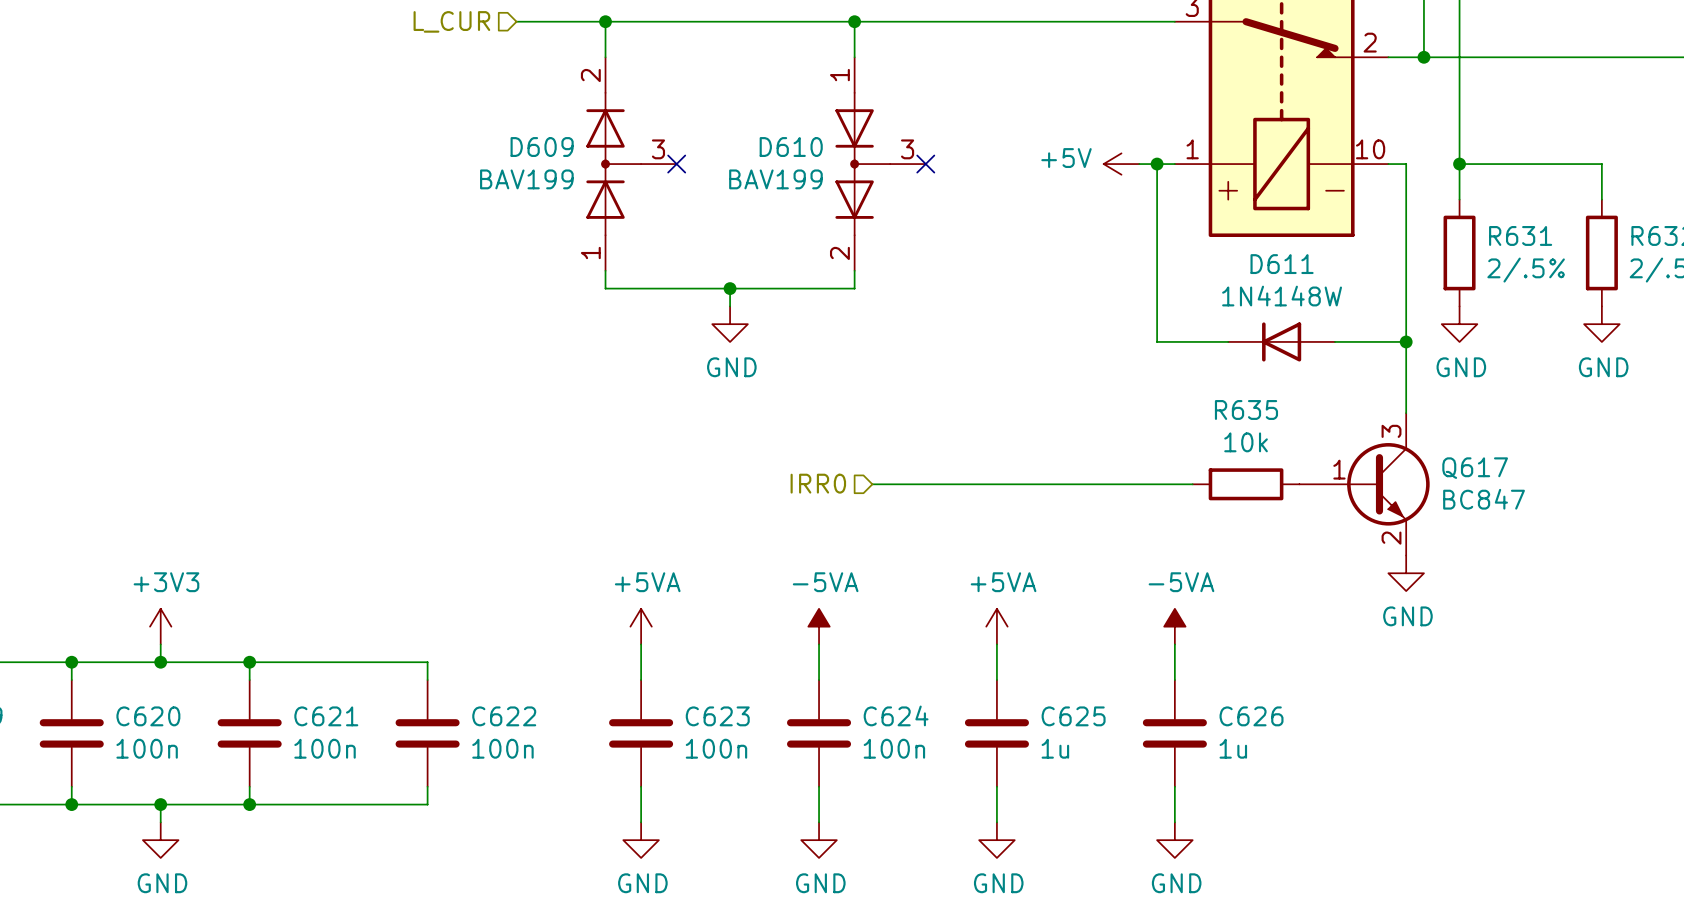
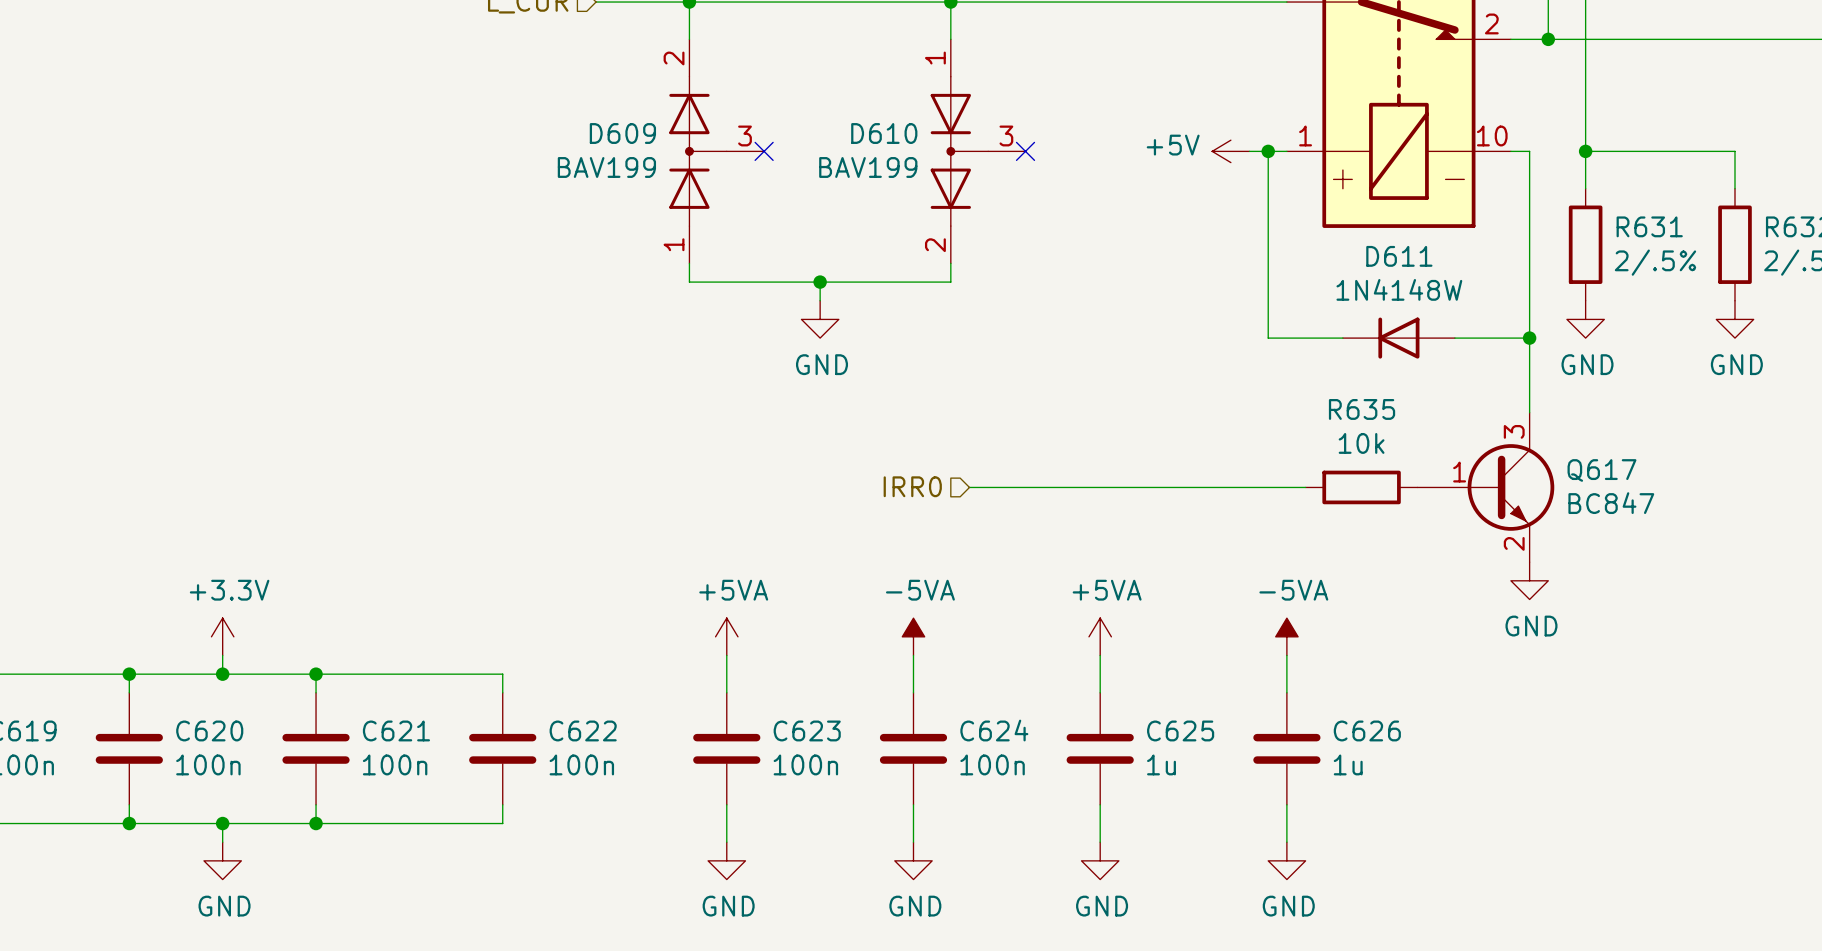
power symbol: +3V3 (160, 626) -> +3.3V (222, 636)

